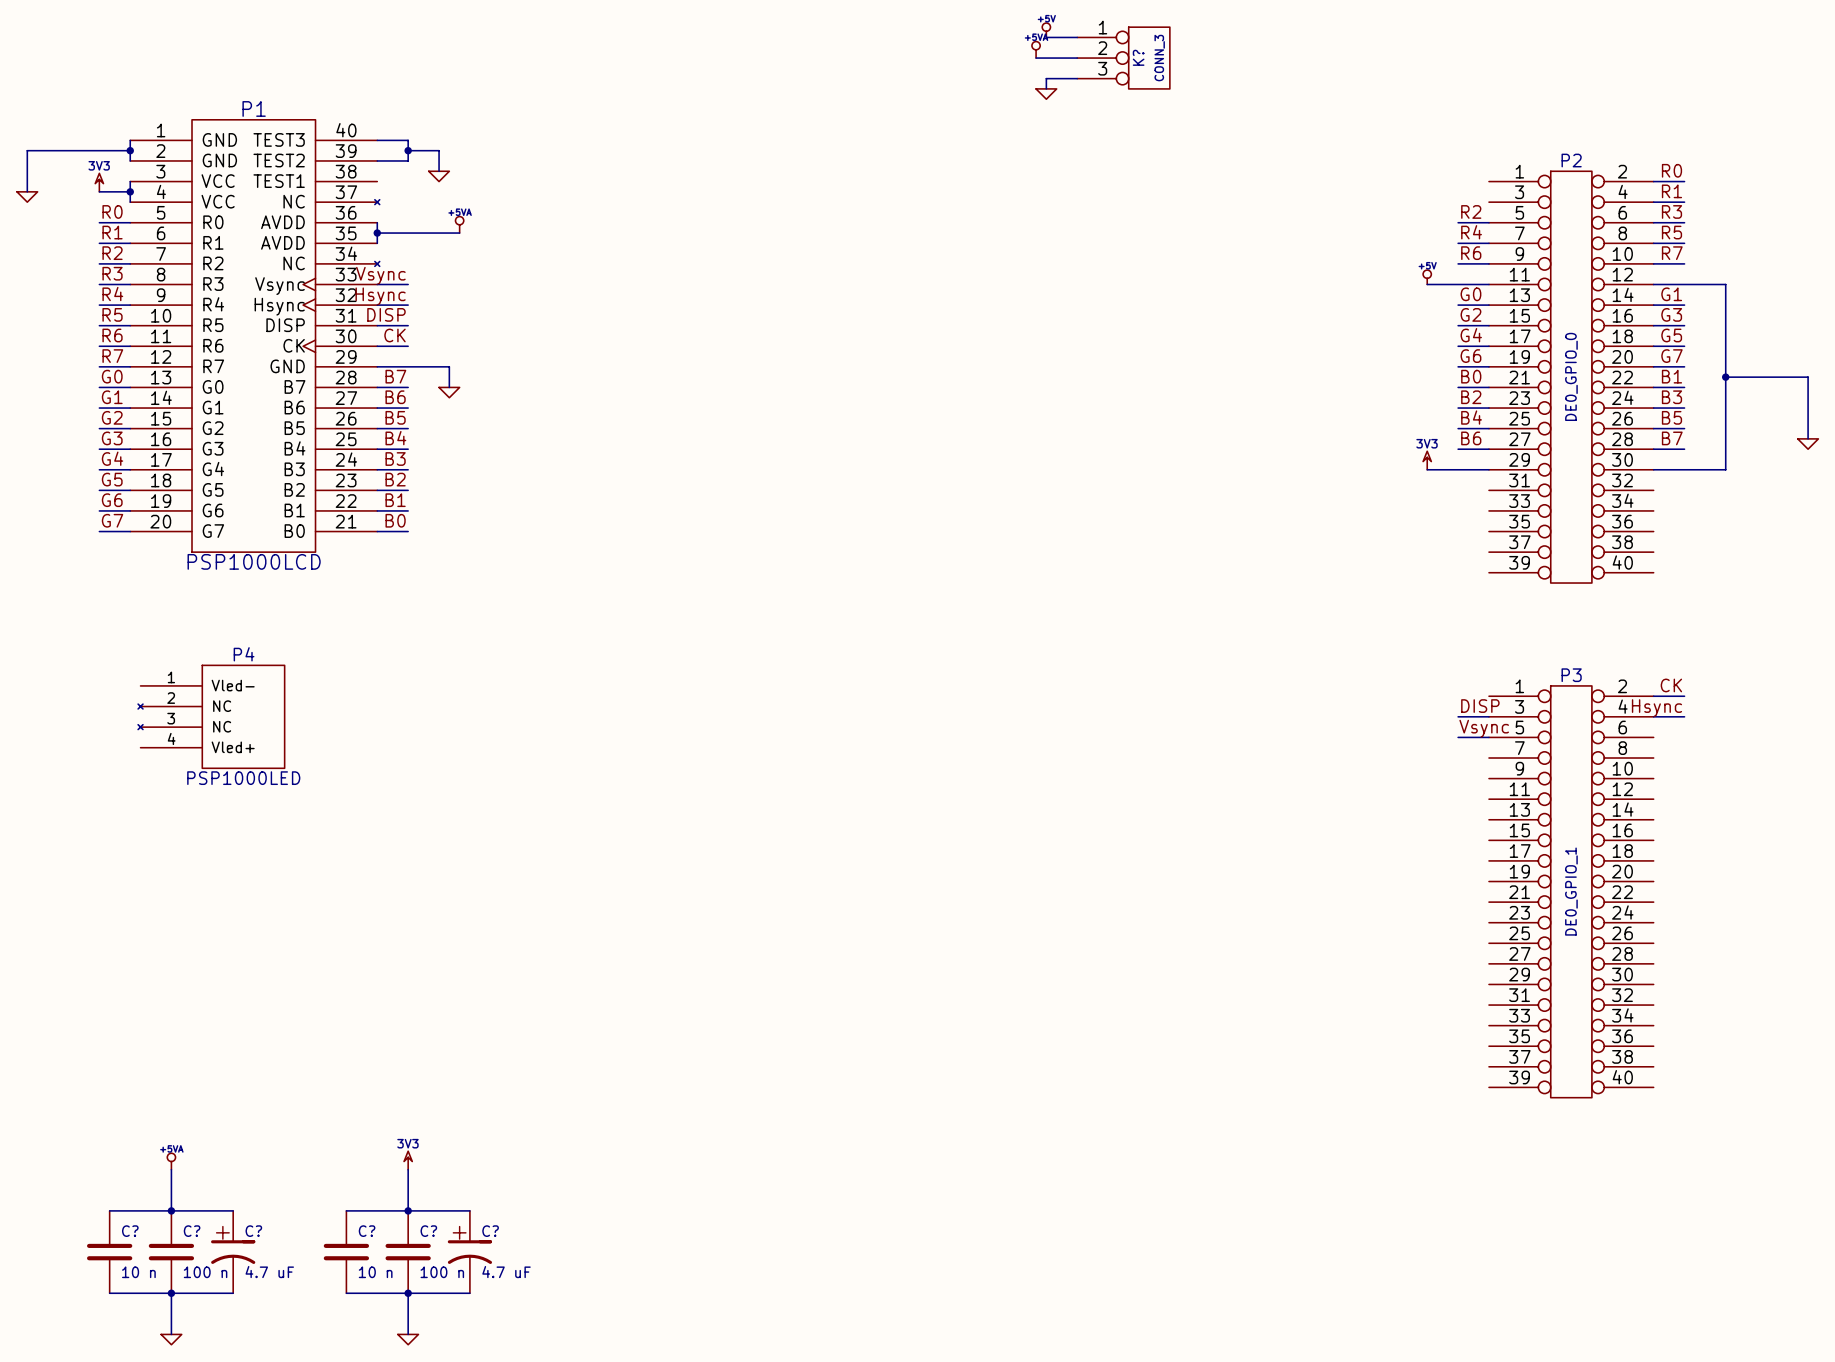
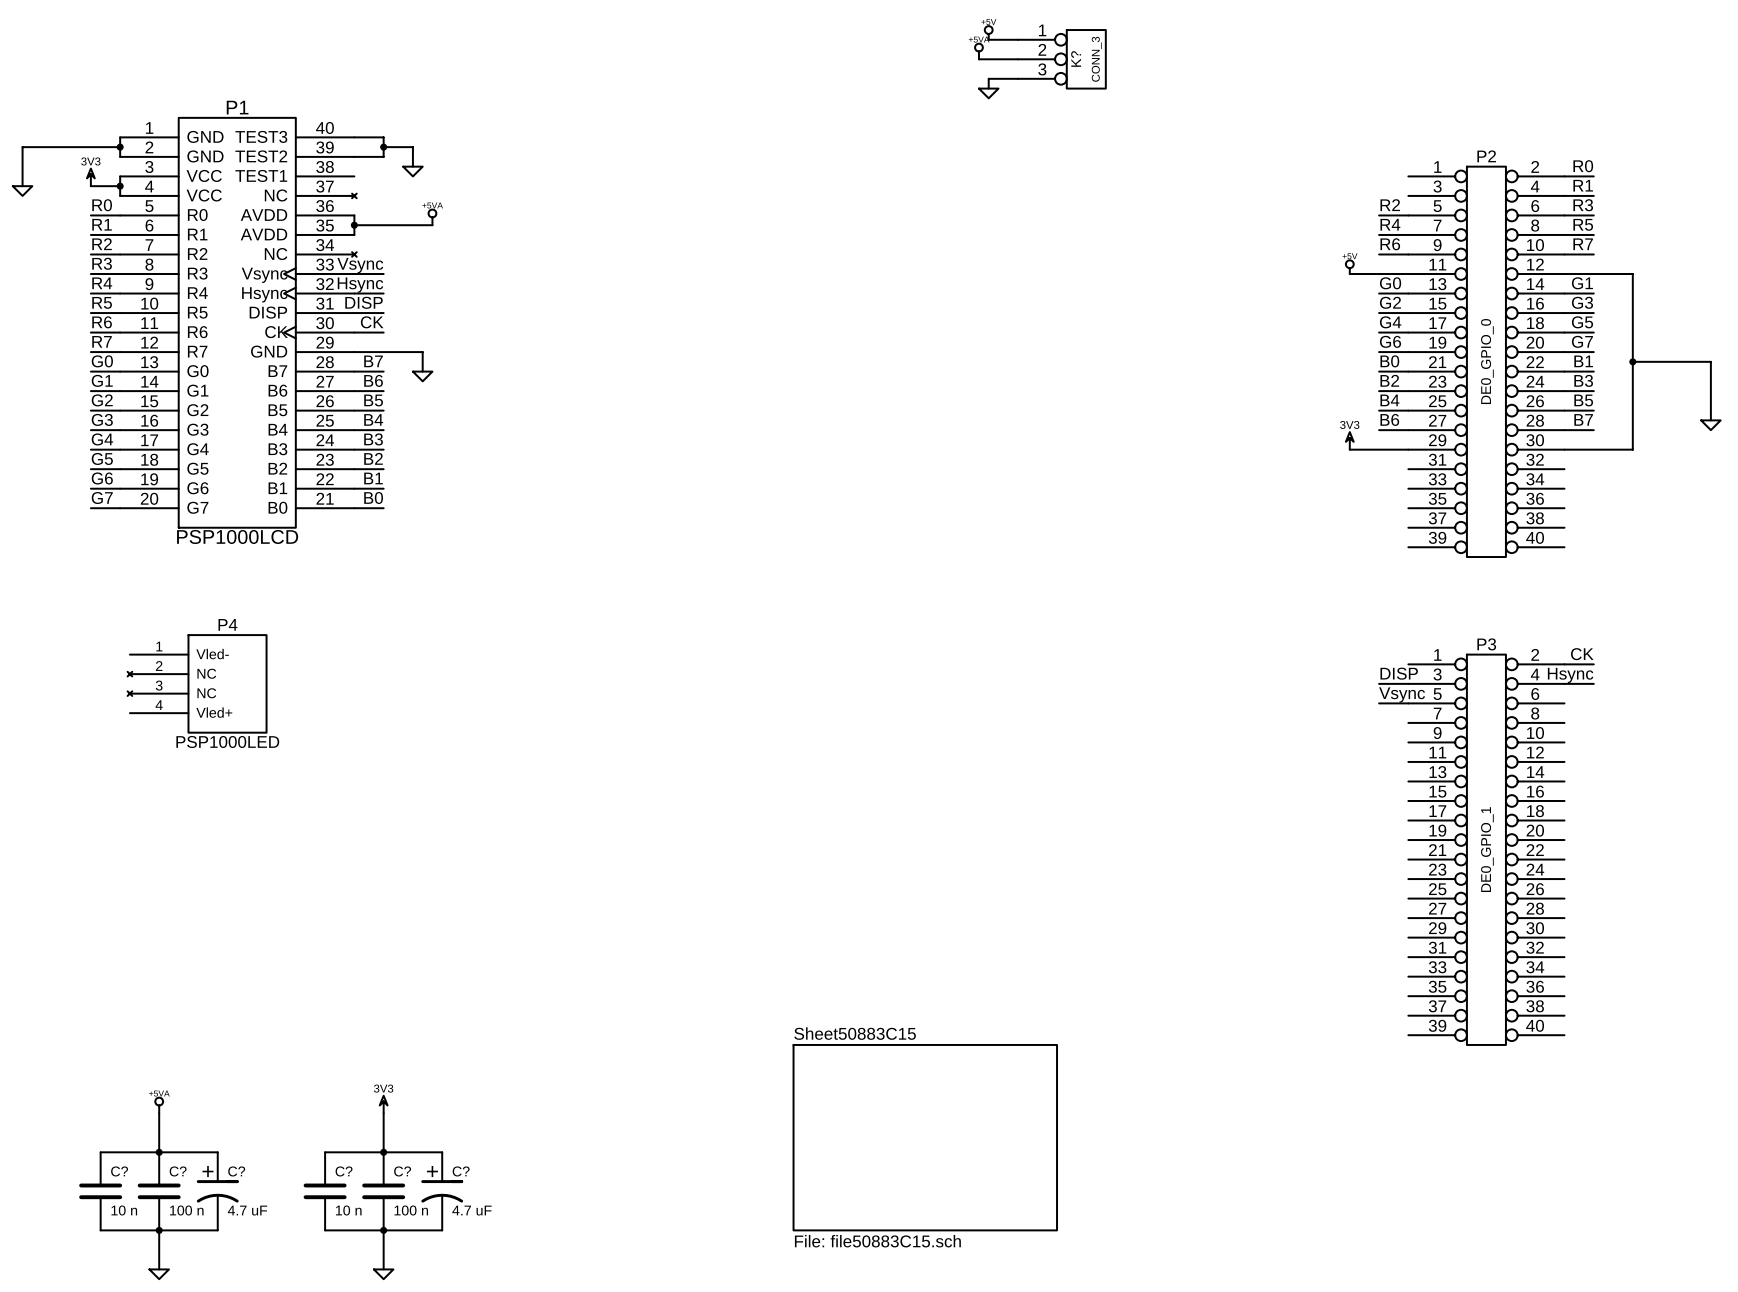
sheet Sheet50883C15: none -> File: file50883C15.sch (925, 1137)

